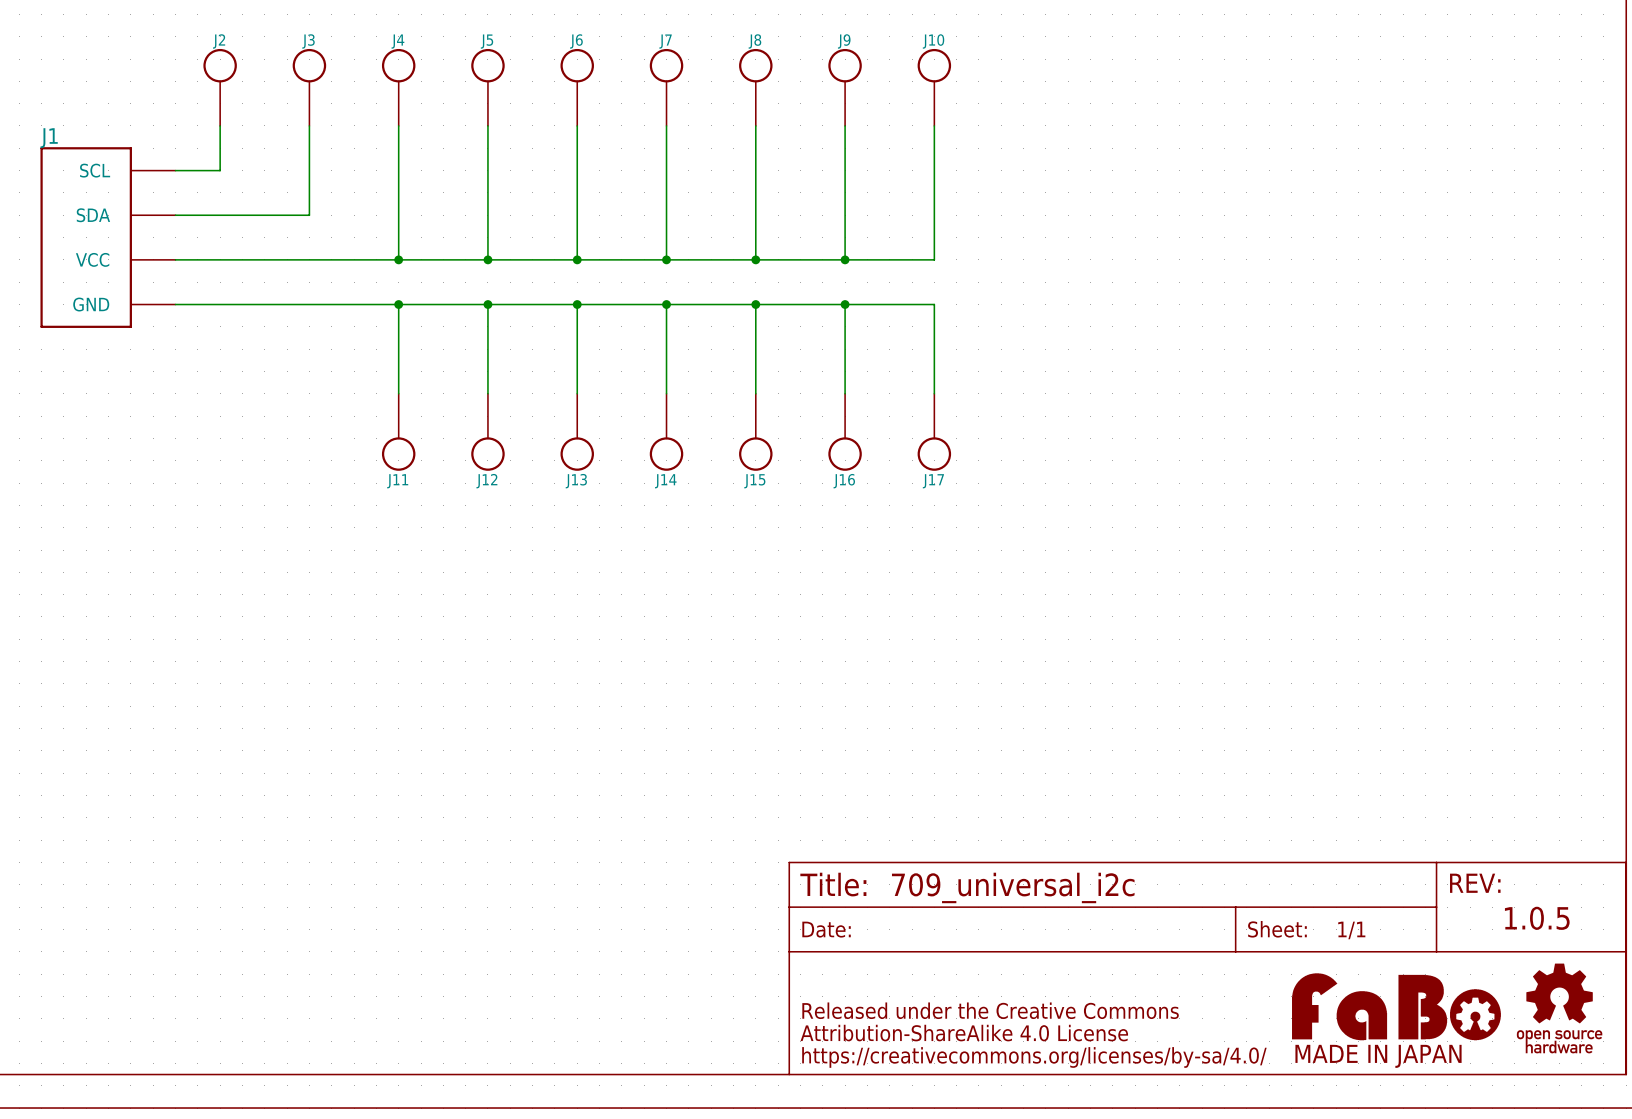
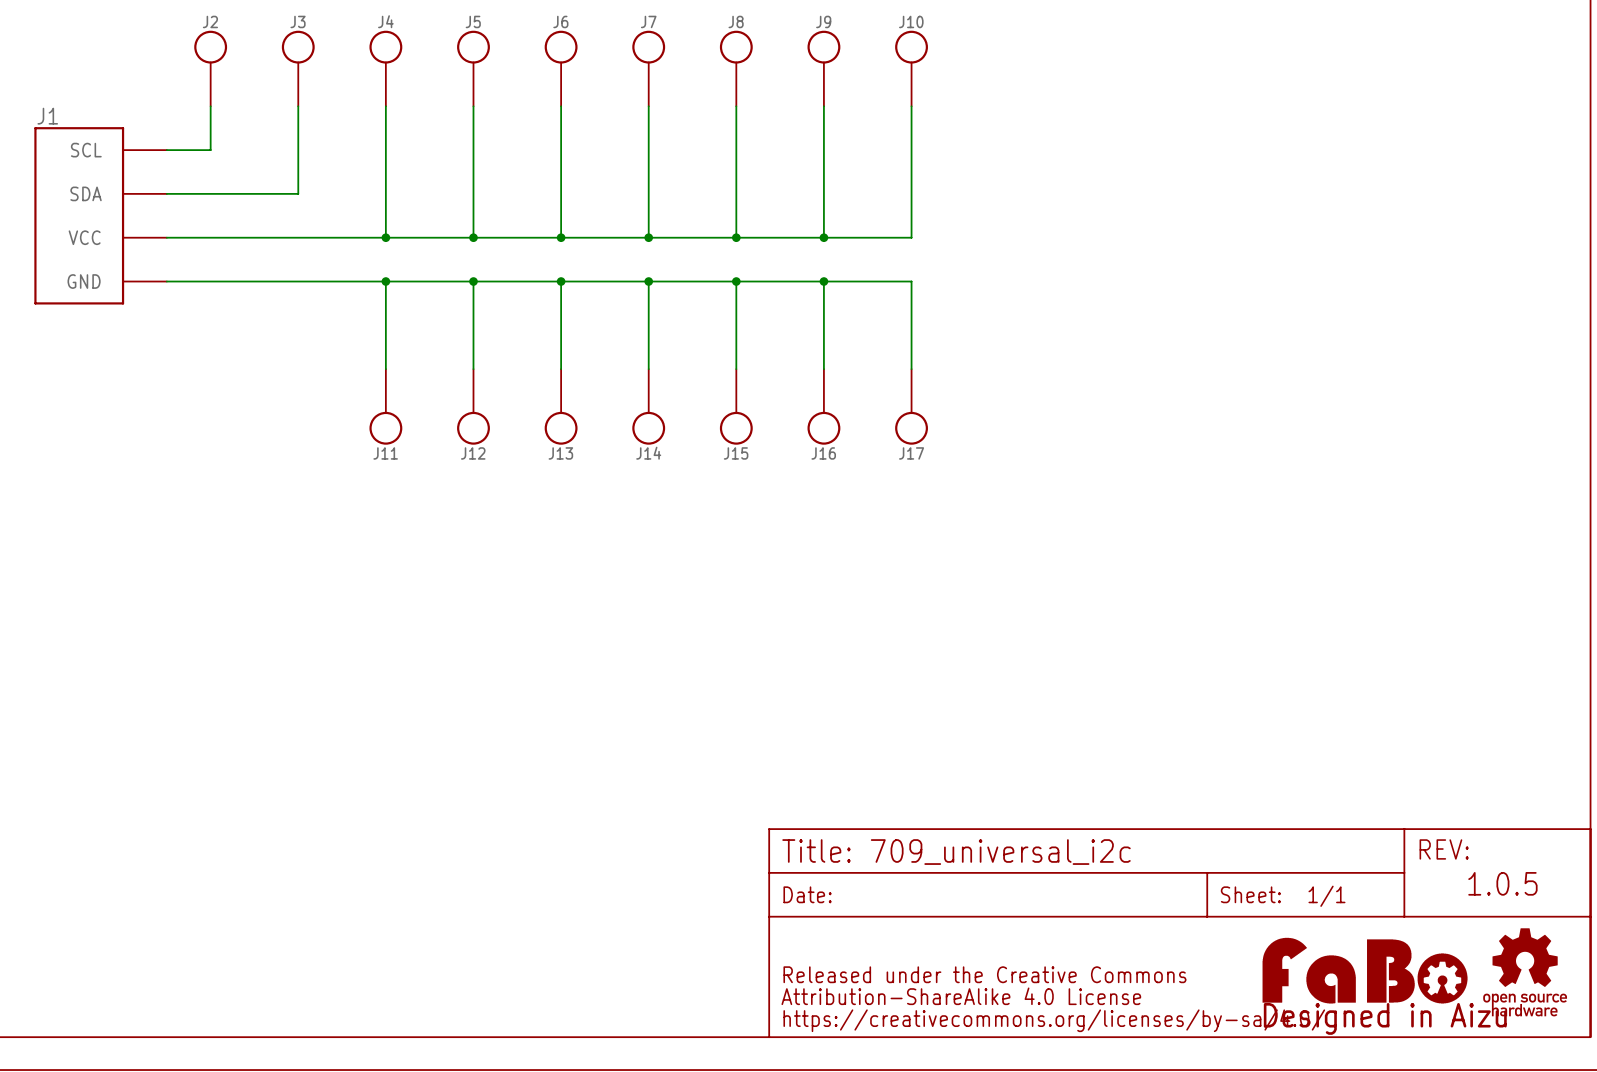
part text: none -> Designed in Aizu (1385, 1018)
part text: MADE IN JAPAN (1378, 1056) -> none

